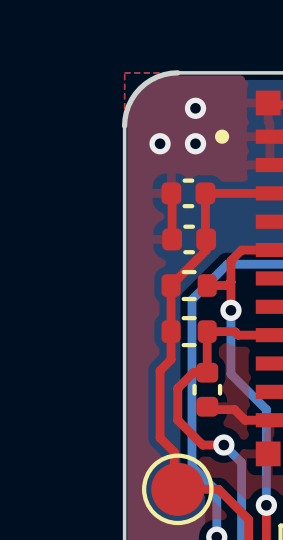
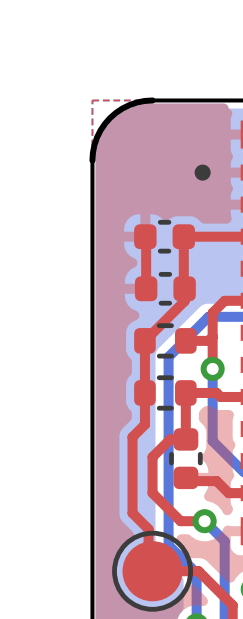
via: (195, 108) -> none
via: (160, 143) -> none
via: (195, 143) -> none

